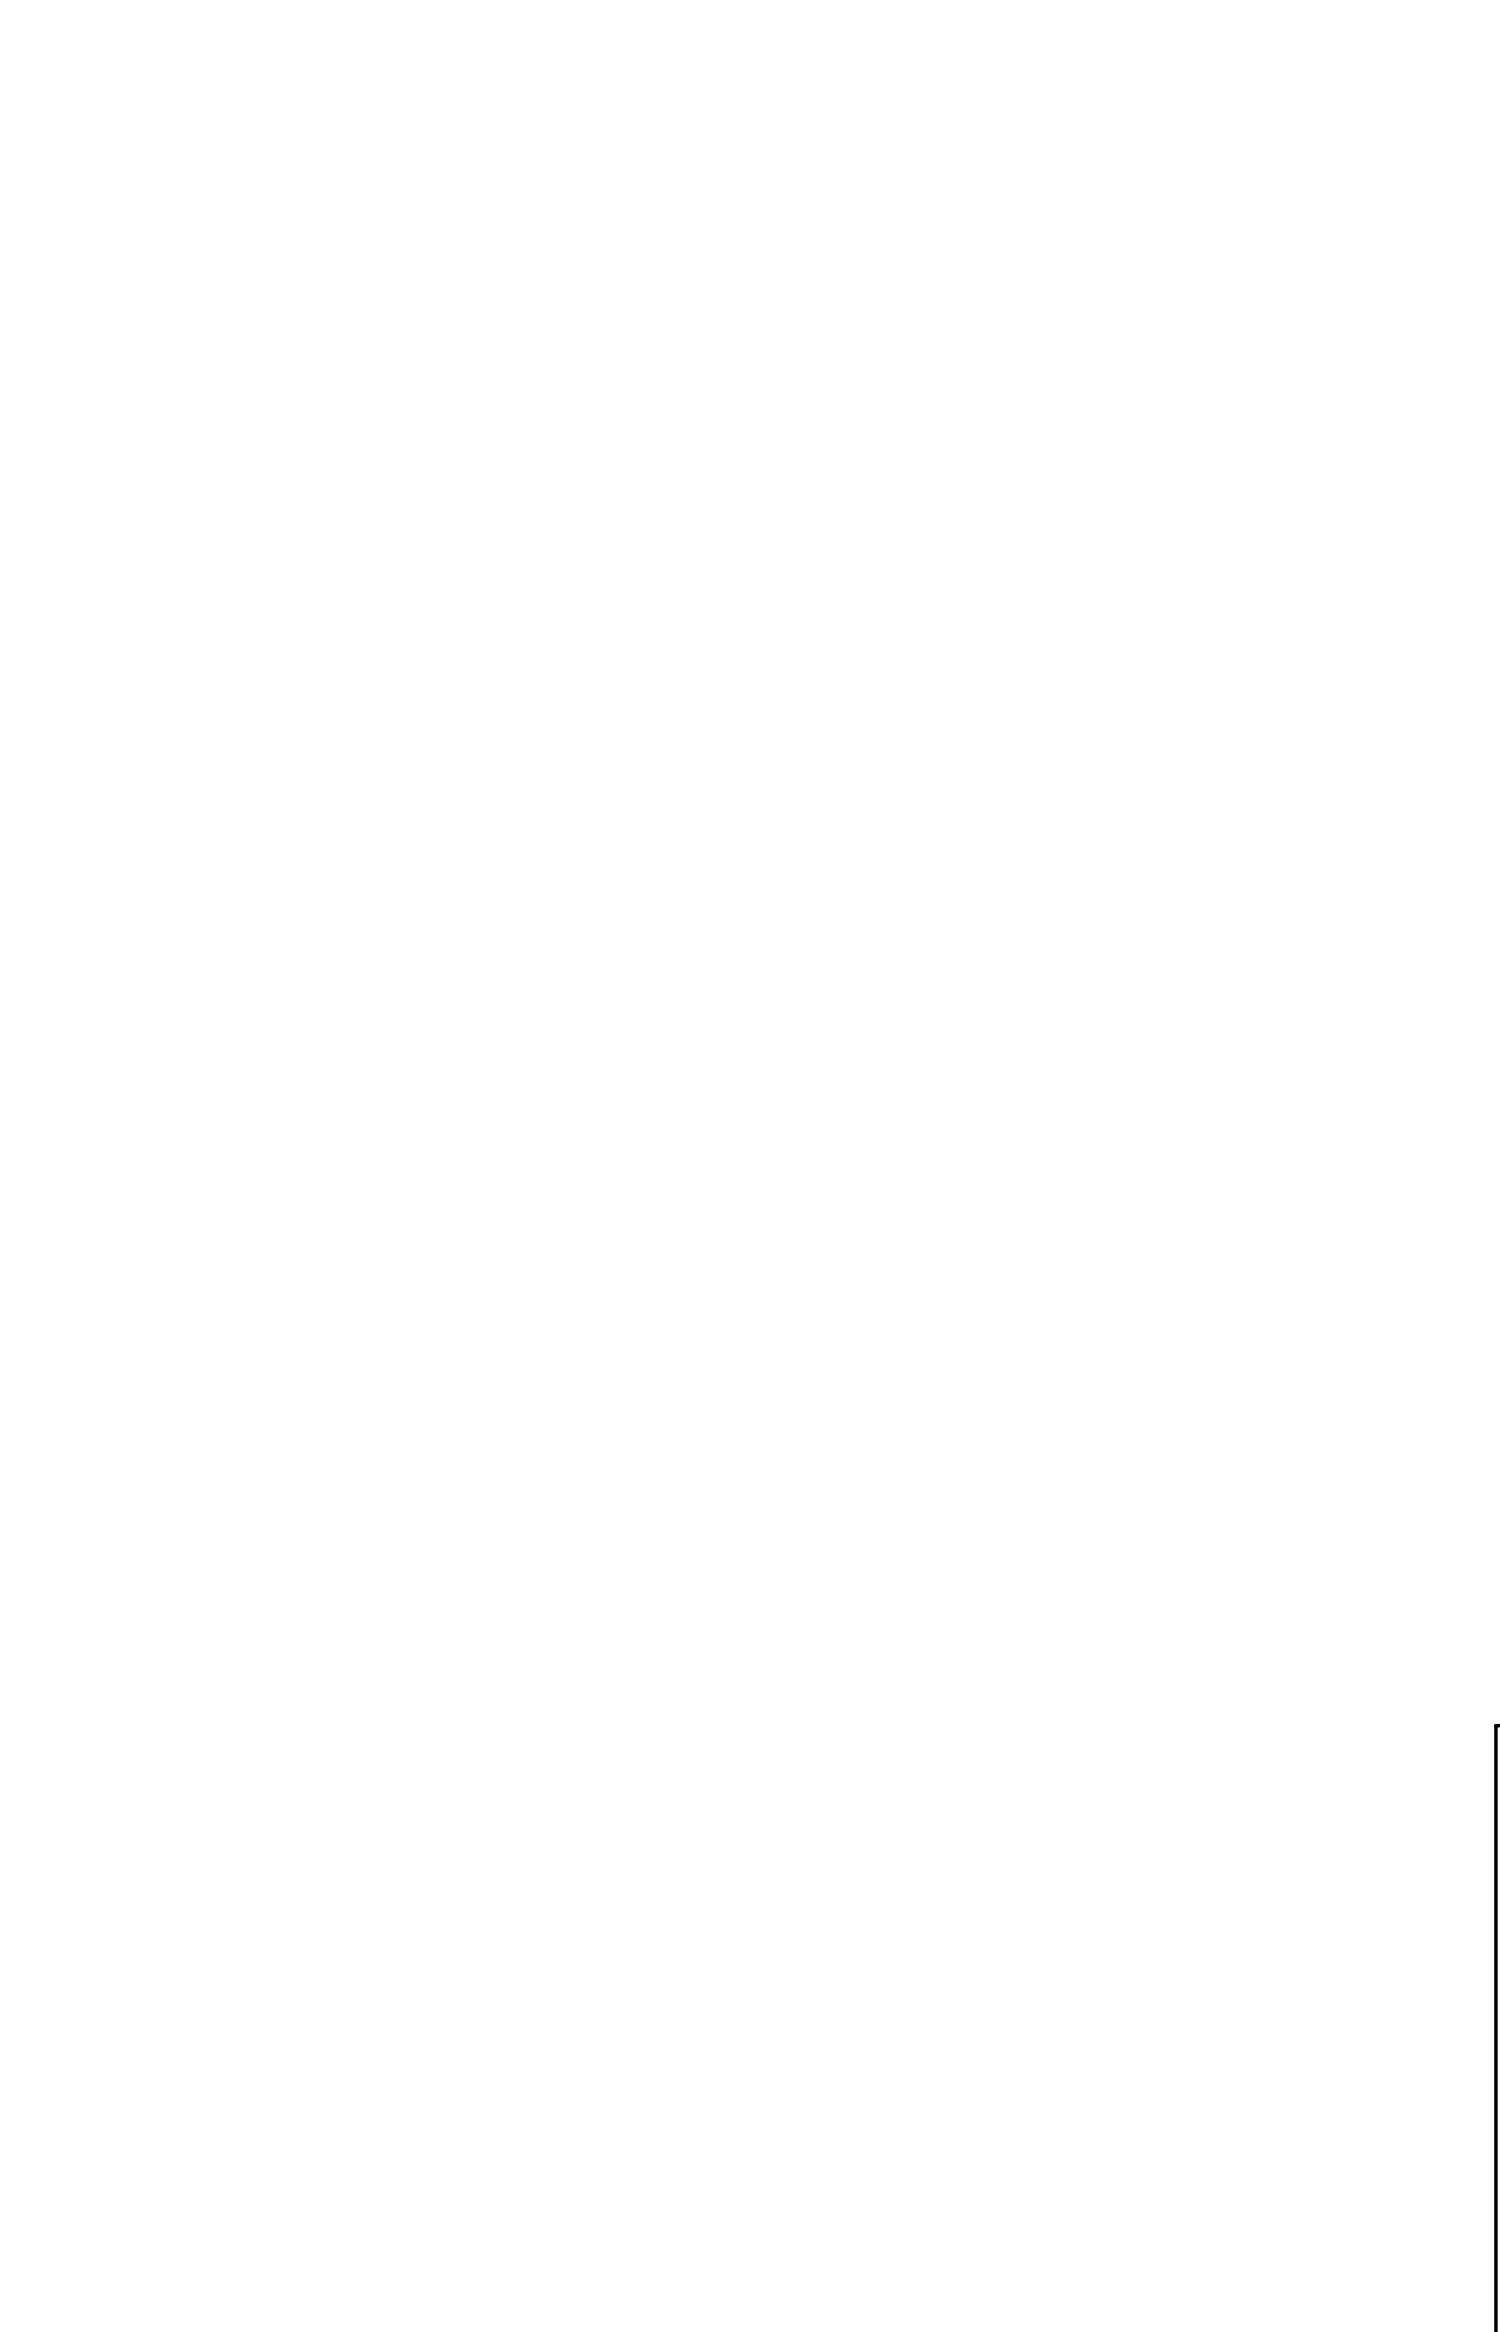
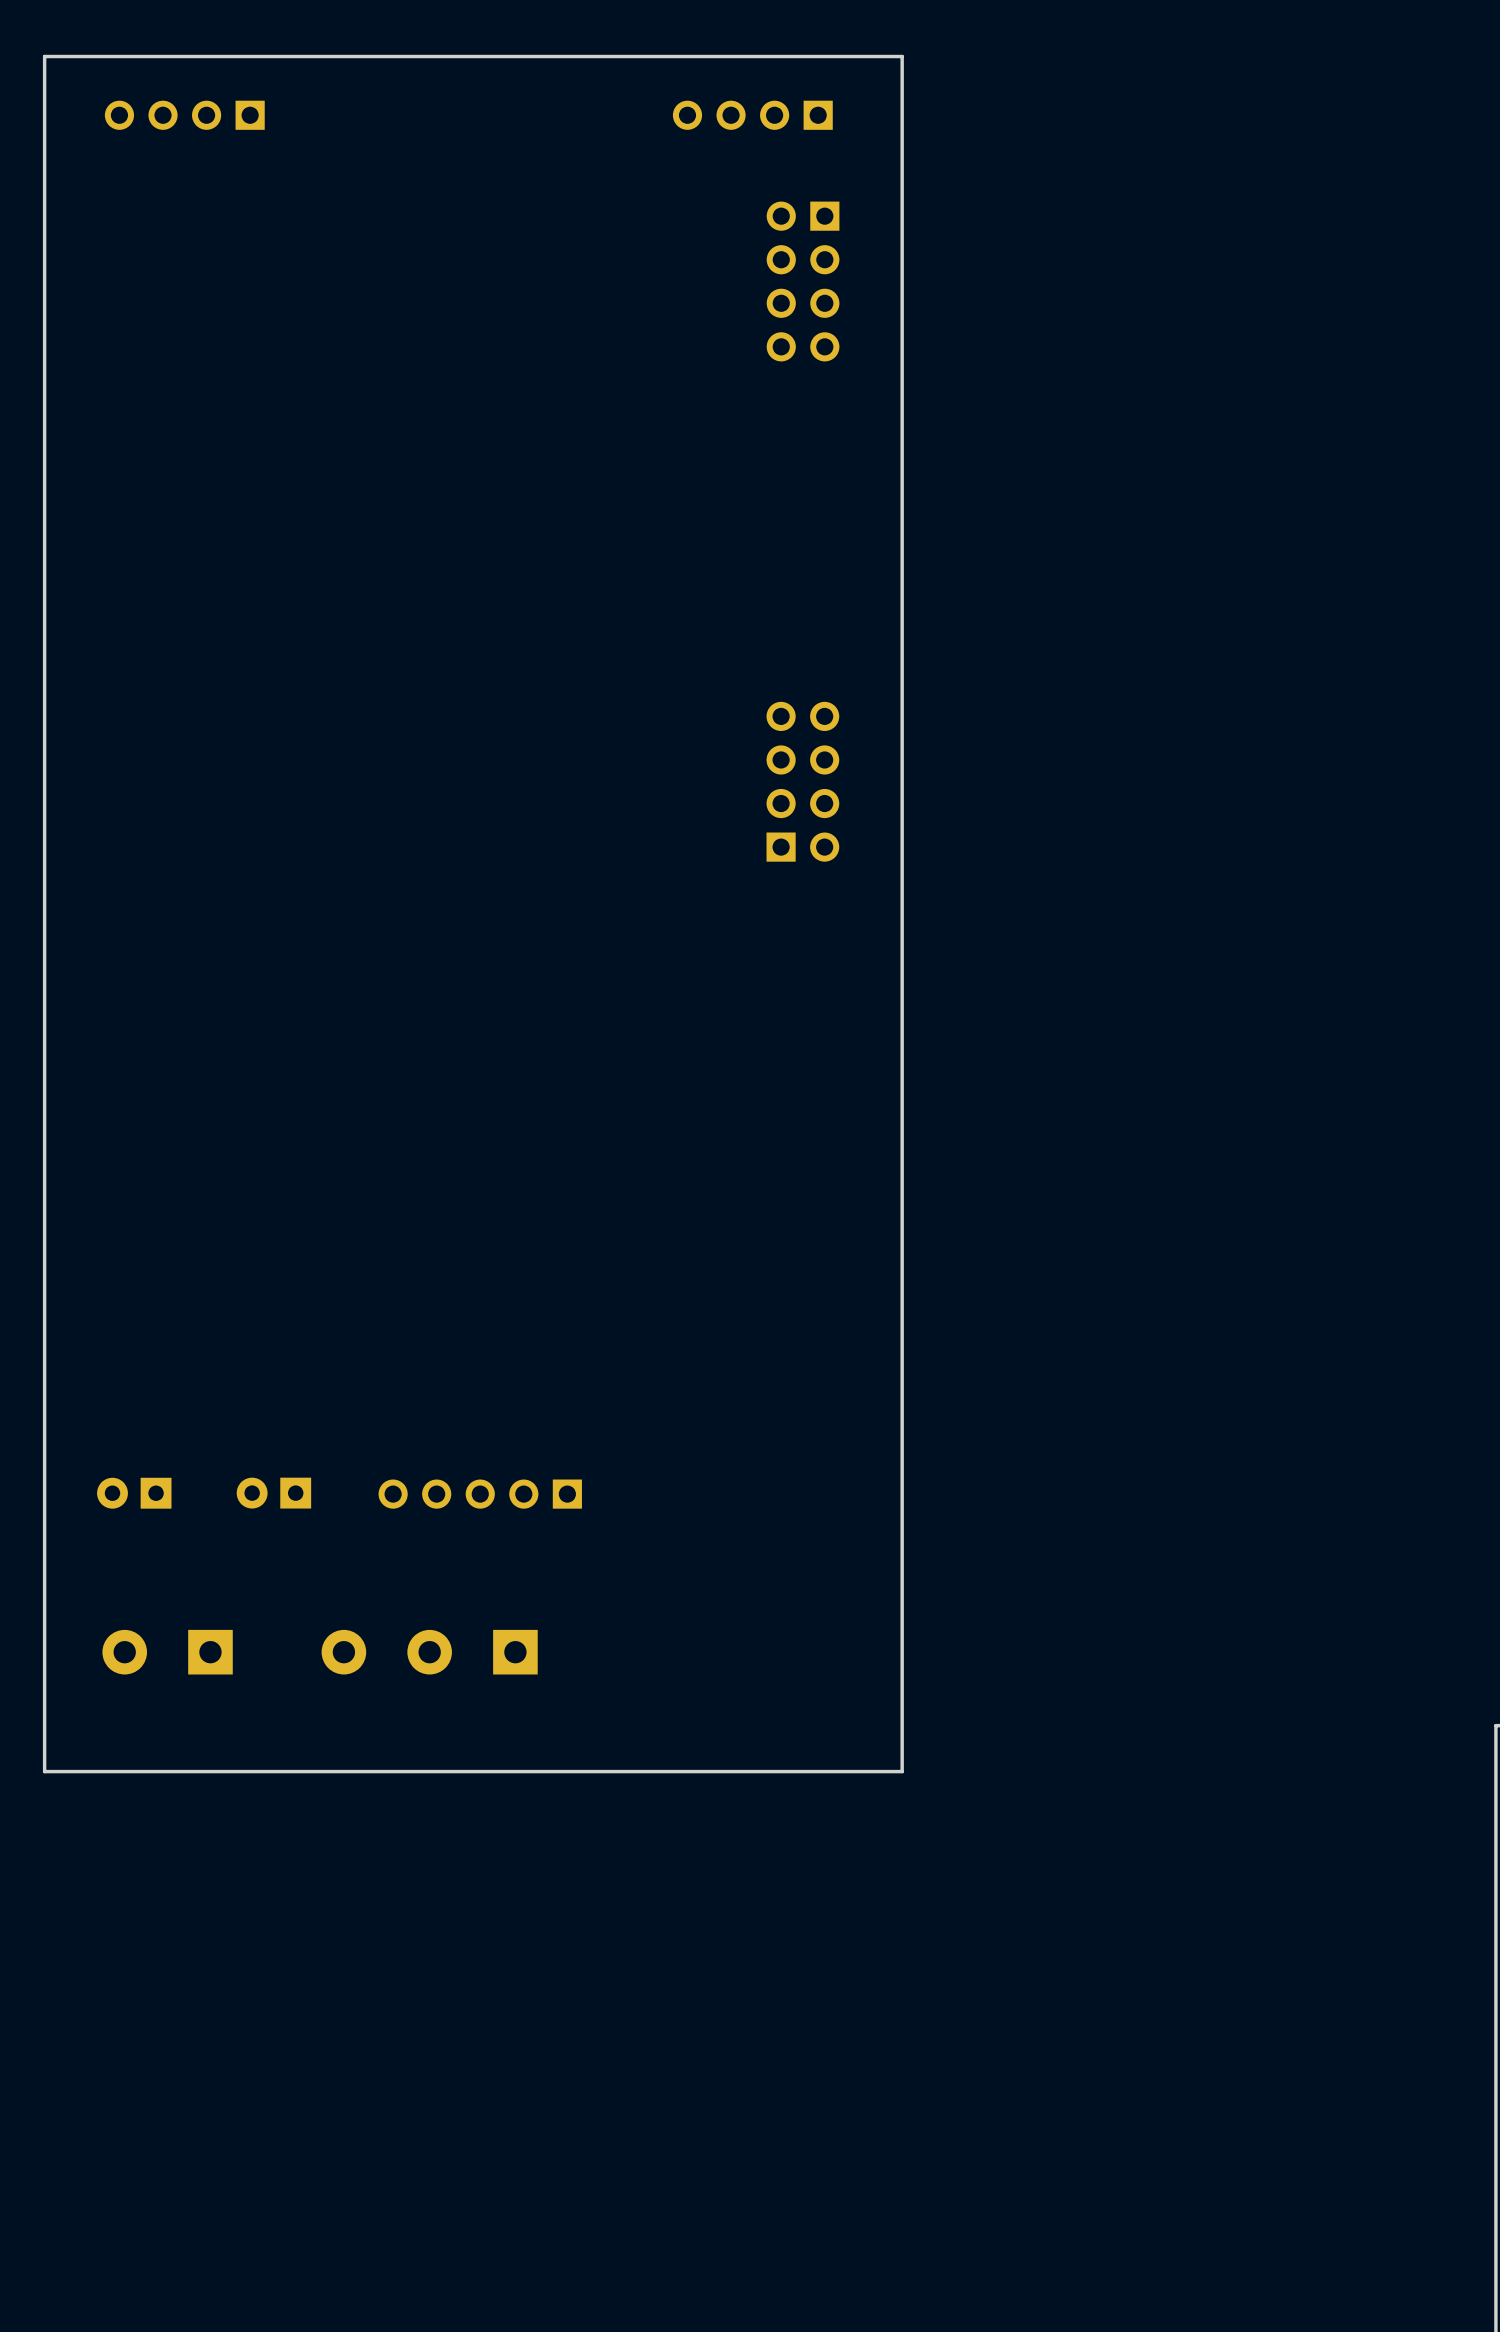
board edge: none -> (902, 56) (44, 56) (44, 1771) (902, 1771) (902, 56)
part: none -> (184, 115)
part: none -> (752, 115)
part: none -> (803, 281)
part: none -> (802, 781)
part: none -> (134, 1493)
part: none -> (273, 1493)
part: none -> (480, 1494)
part: none -> (167, 1652)
part: none -> (429, 1652)

